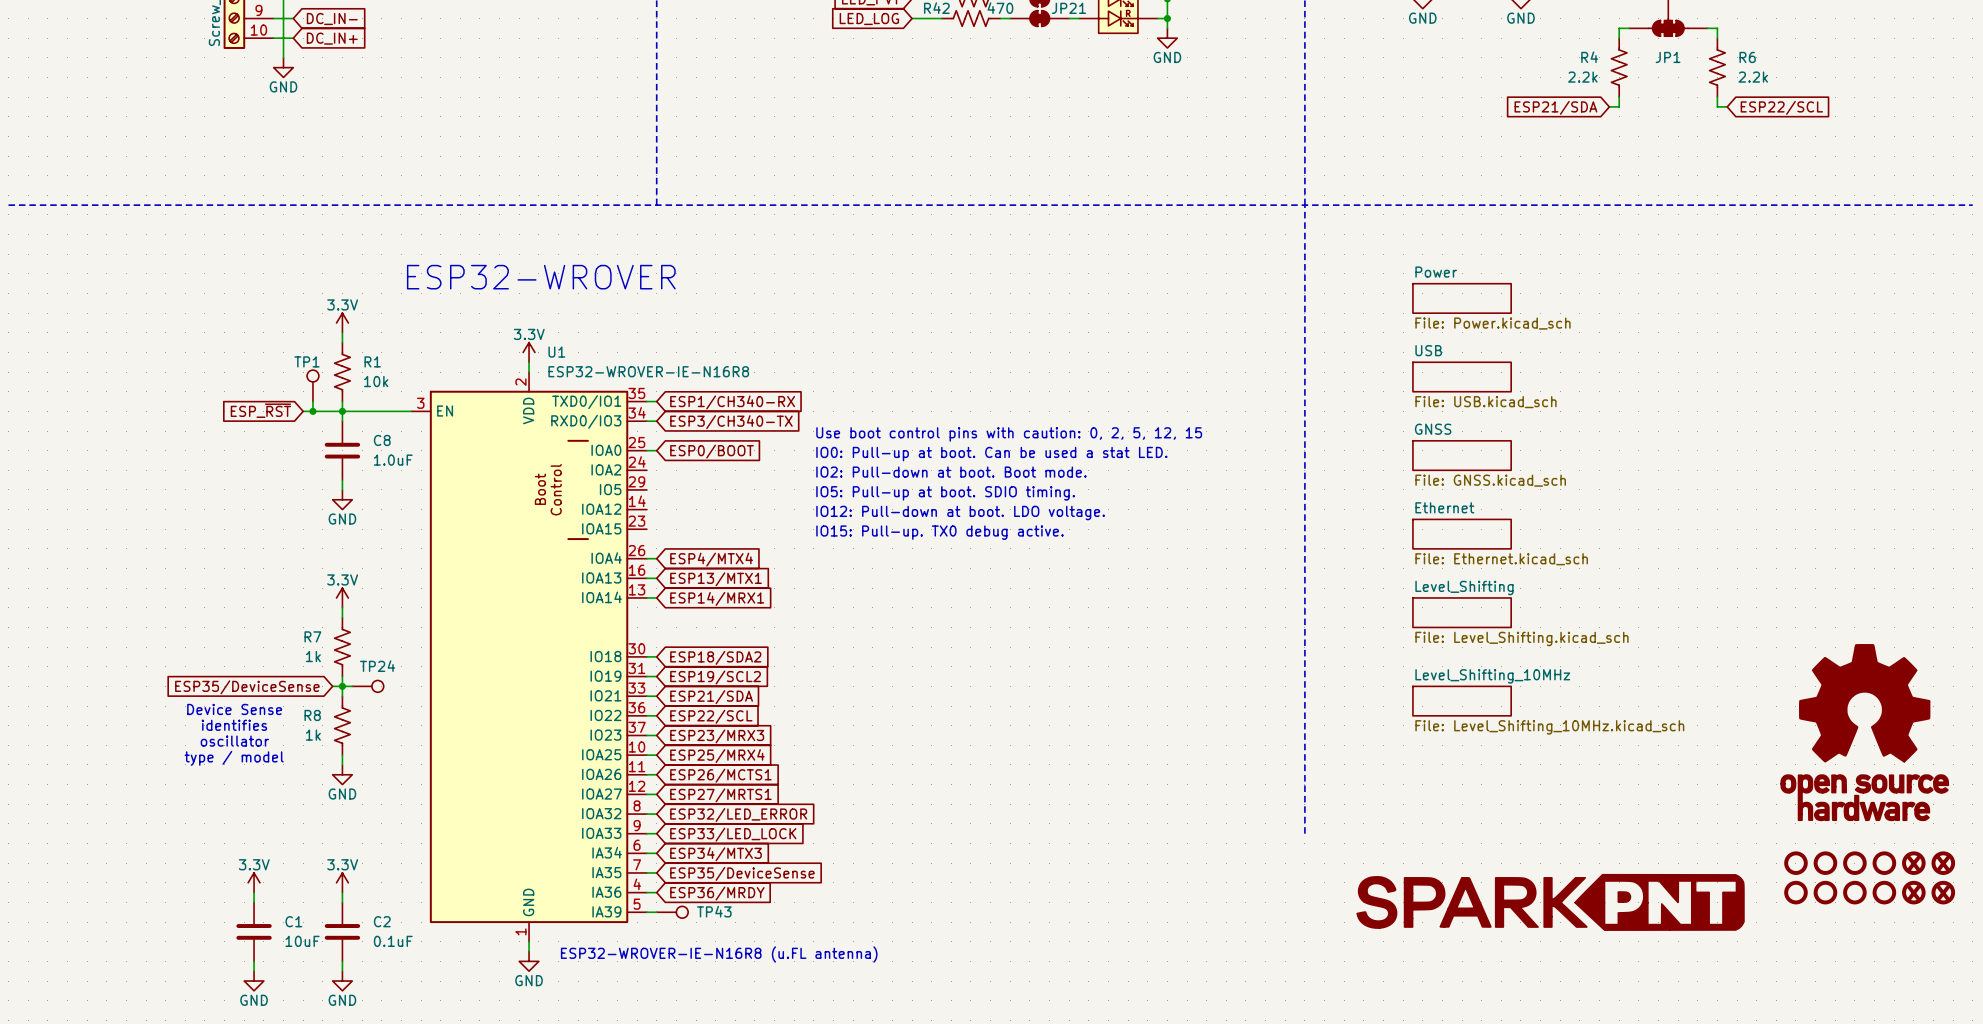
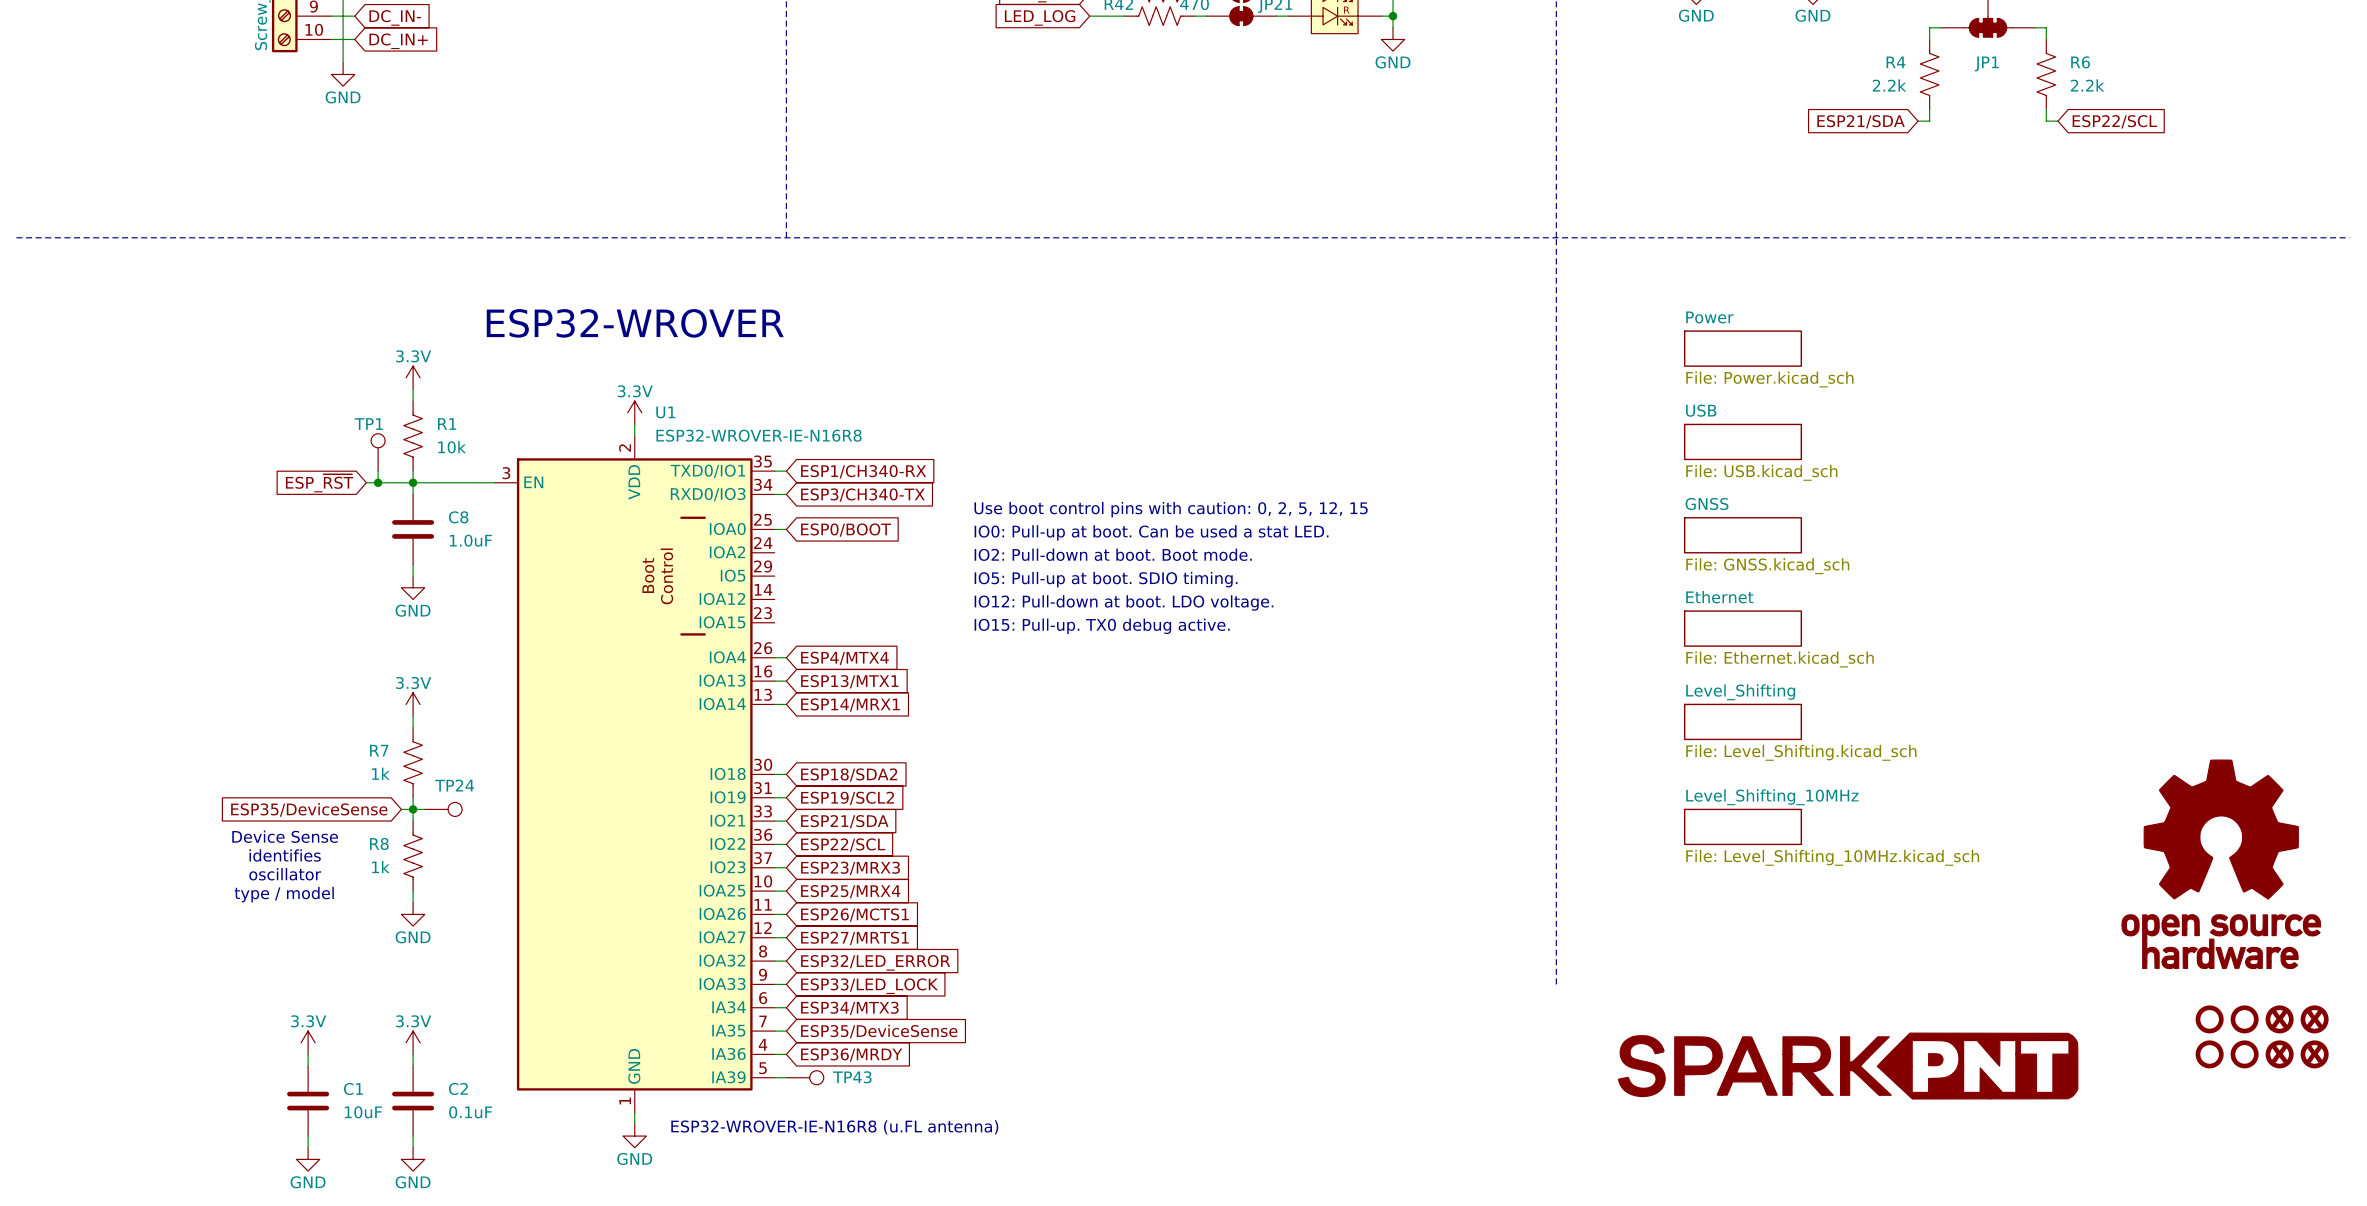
part: (1795, 863) -> none
part: (1825, 863) -> none
part: (1795, 892) -> none
part: (1825, 892) -> none

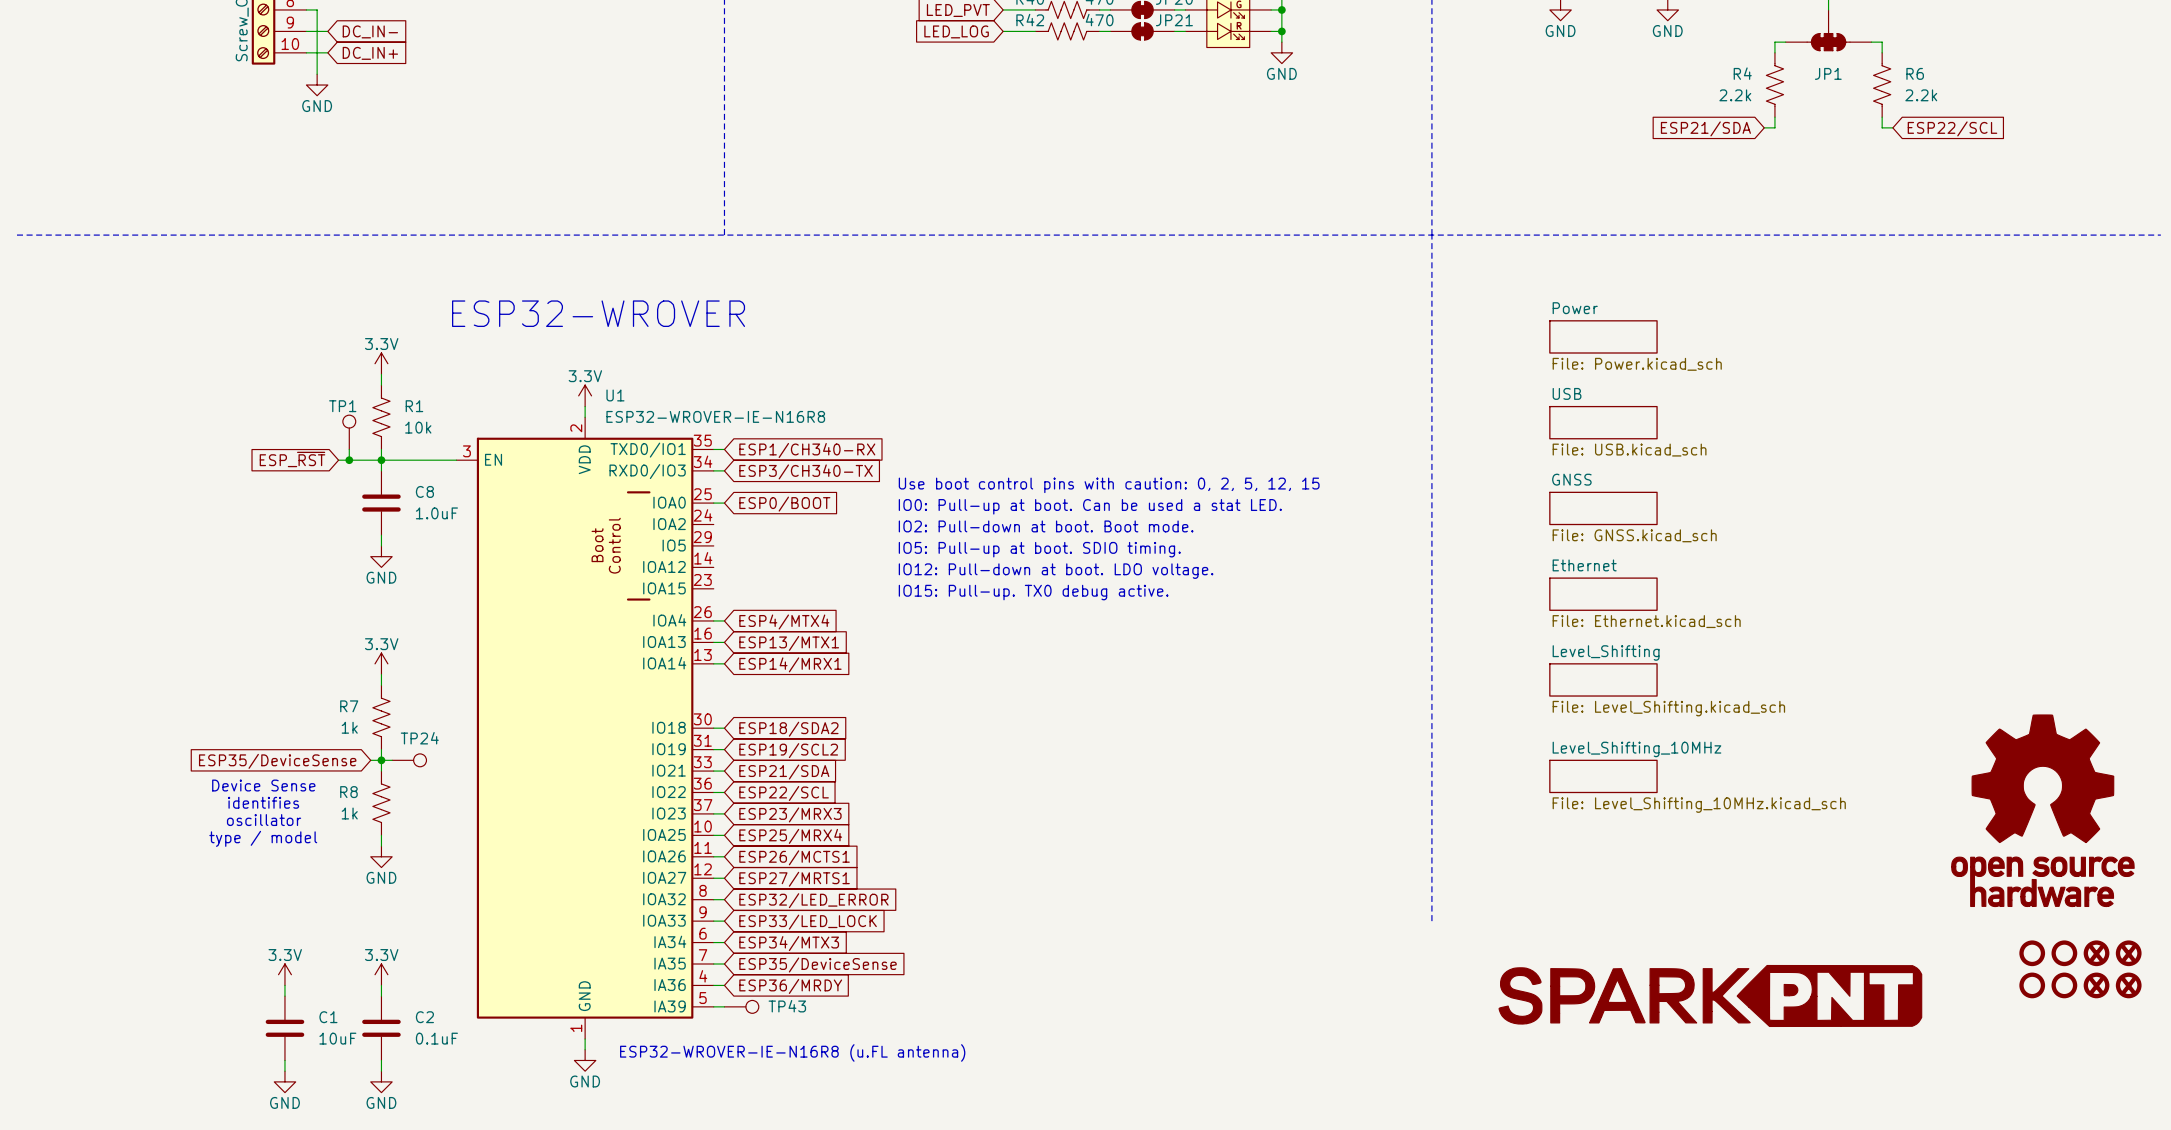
part: none -> (1710, 995)
part: (1848, 1066) -> none

